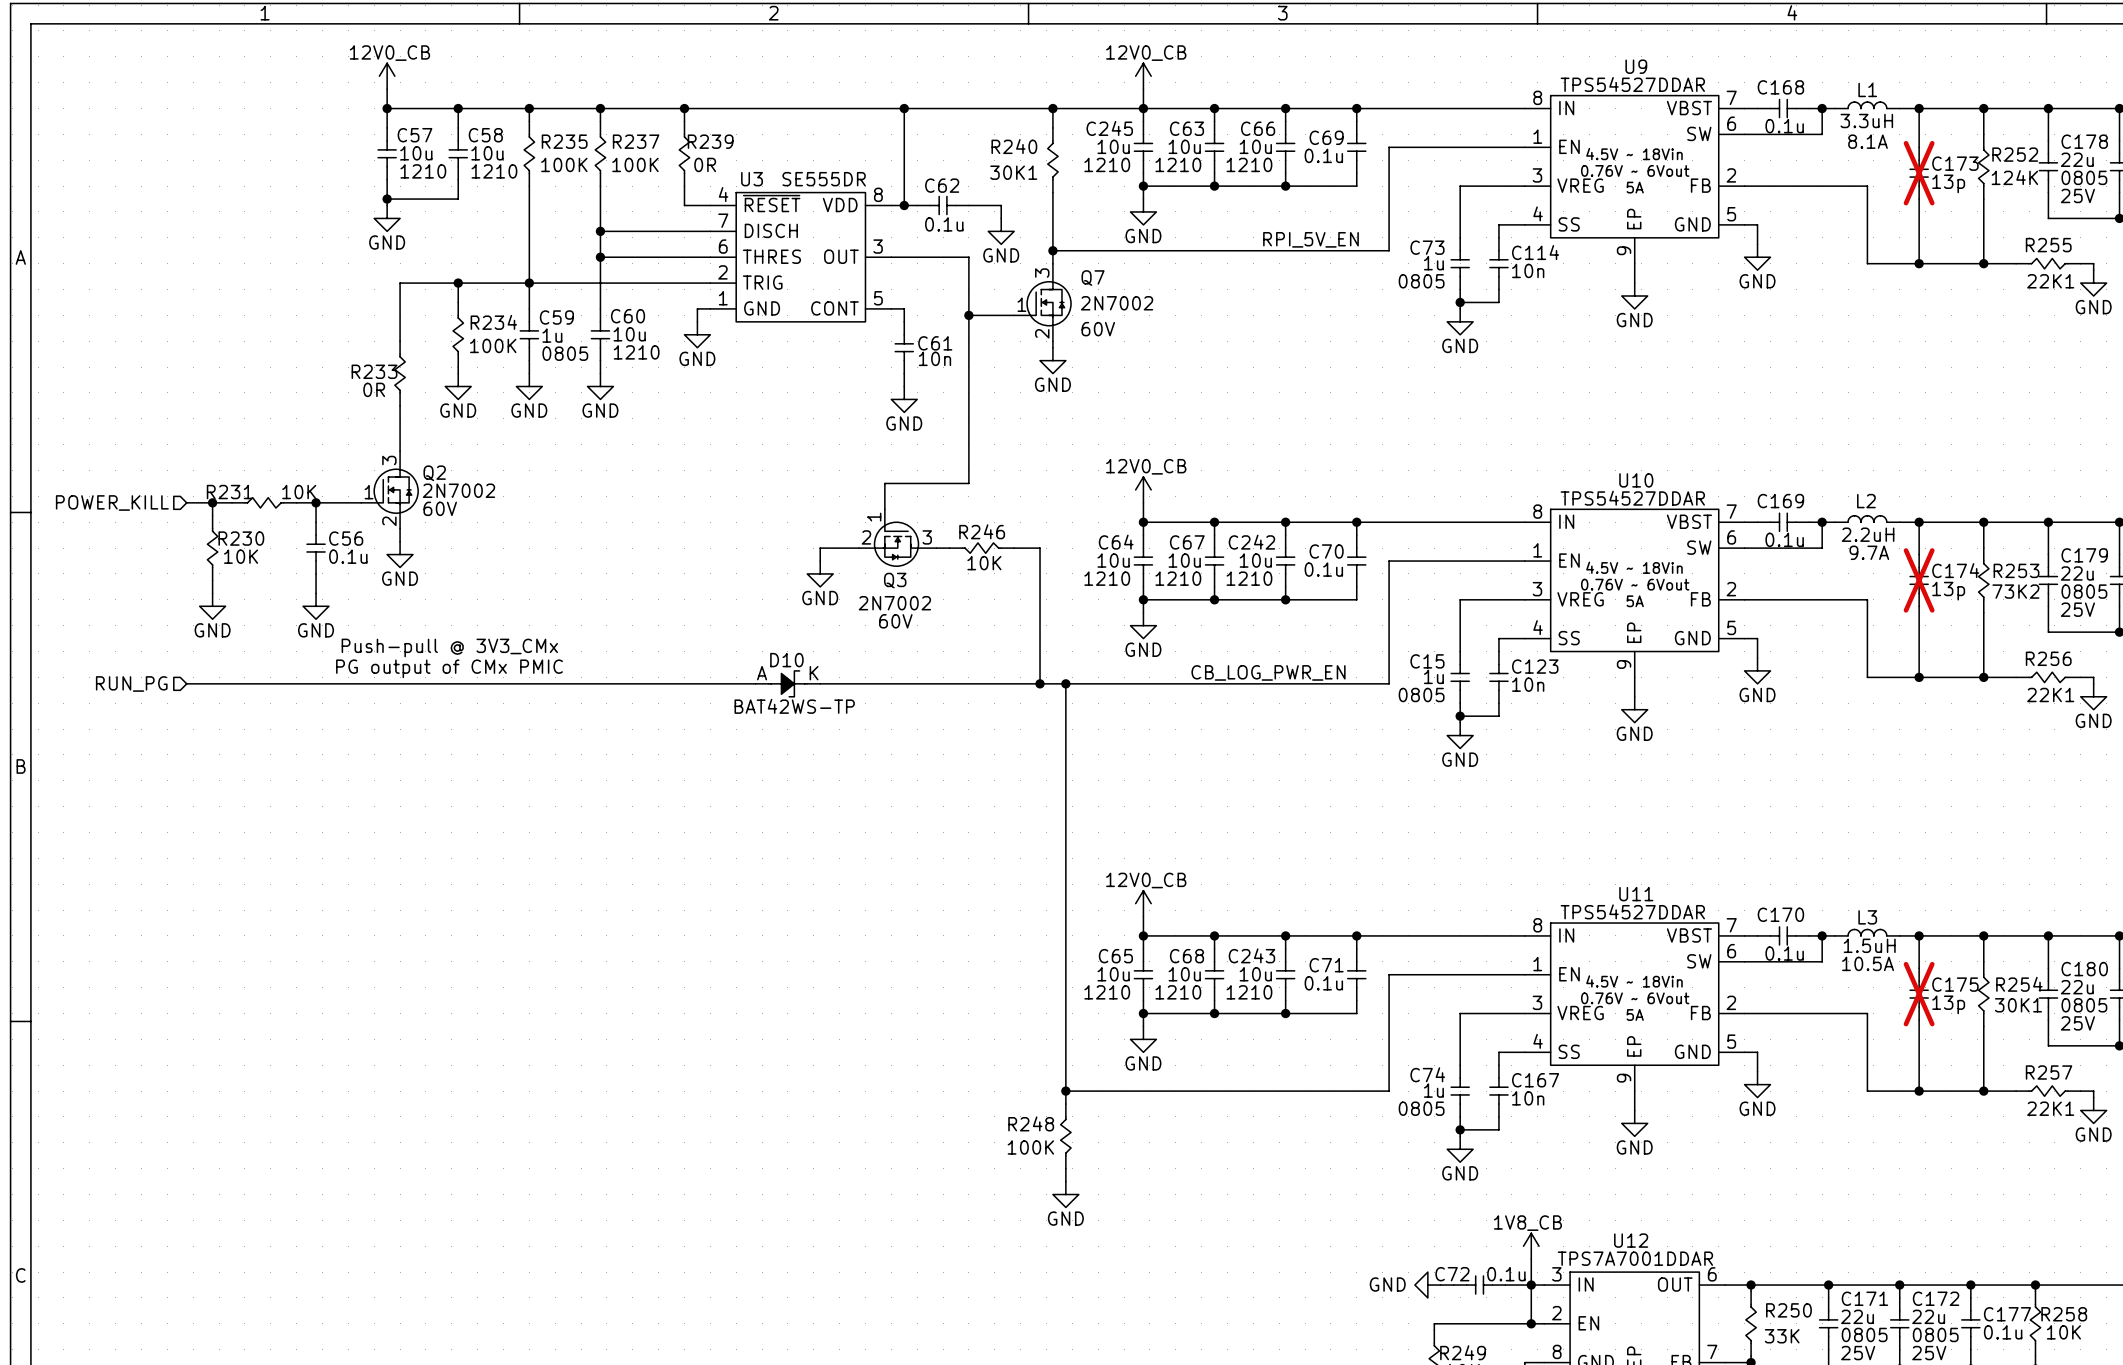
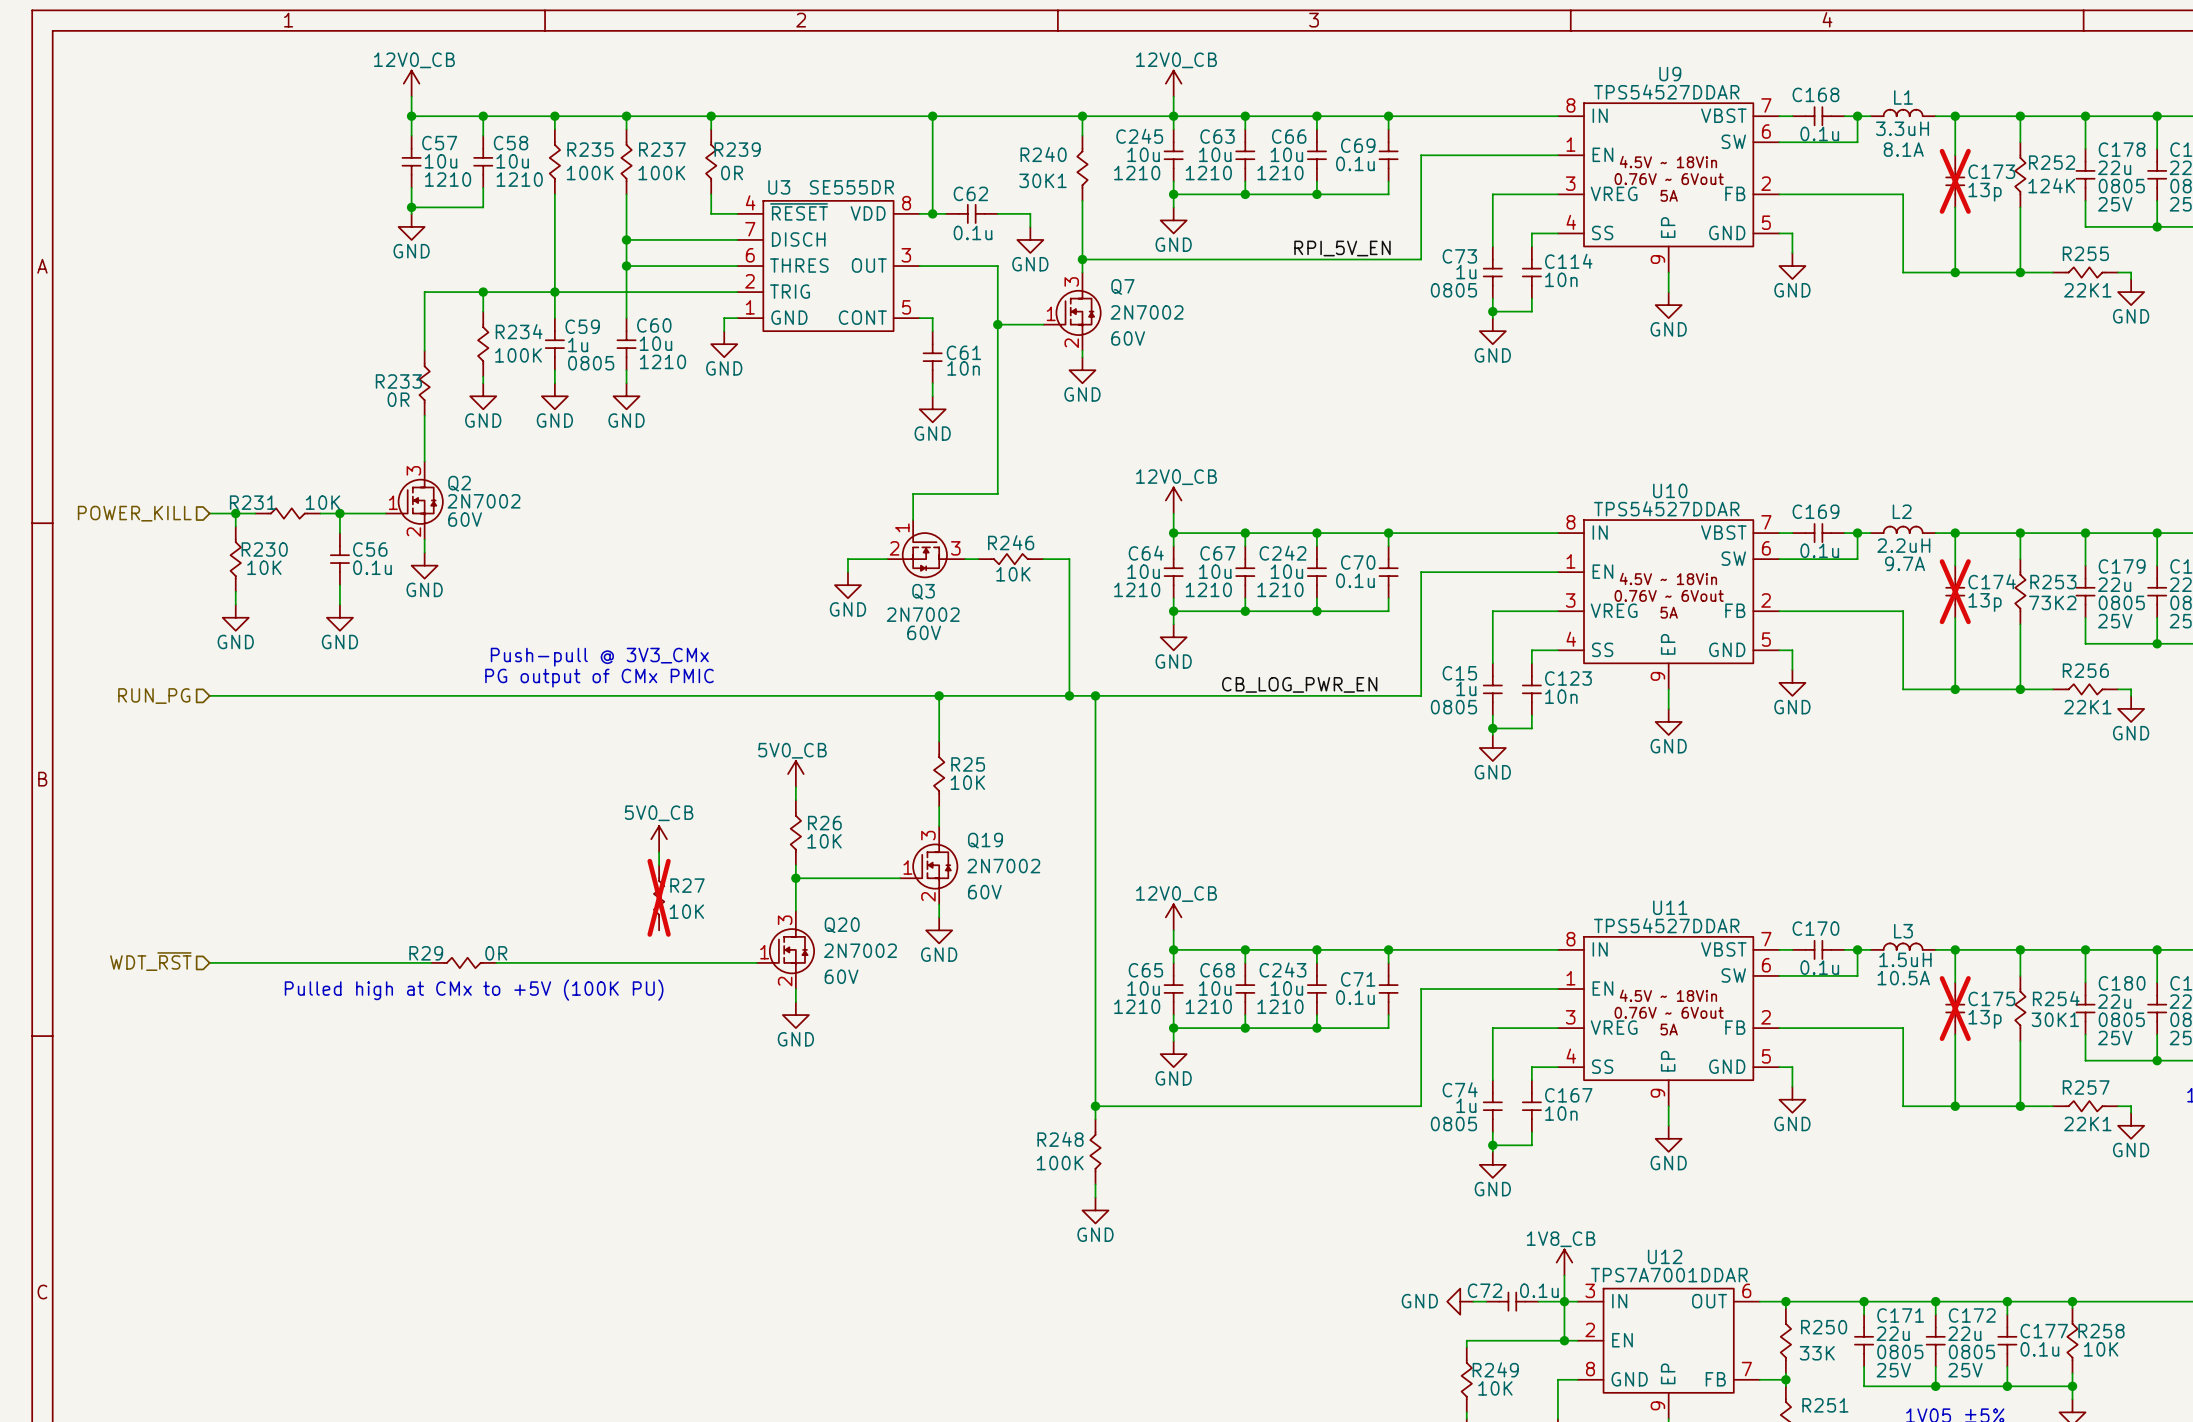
text position: Push-pull @ 3V3_CMx (449, 648) -> Push-pull @ 3V3_CMx (599, 657)
text position: PG output of CMx PMIC (449, 668) -> PG output of CMx PMIC (599, 678)
D10: BAT42WS-TP (787, 683) -> none
wire: none -> (939, 695) (939, 741)
junction: none -> (939, 695)
power symbol: none -> 5V0_CB (795, 774)
R25: none -> 10K (939, 774)
wire: none -> (795, 787) (795, 800)
wire: none -> (939, 806) (939, 826)
R26: none -> 10K (795, 832)
power symbol: none -> 5V0_CB (659, 839)
wire: none -> (659, 852) (659, 865)
wire: none -> (795, 865) (795, 910)
Q19: none -> 2N7002 (928, 865)
wire: none -> (795, 878) (900, 878)
junction: none -> (795, 878)
R27: none -> 10K (659, 897)
wire: none -> (939, 904) (939, 917)
power symbol: none -> GND (939, 930)
Q20: none -> 2N7002 (785, 949)
hierarchical label: none -> WDT_~{RST} (150, 961)
wire: none -> (209, 962) (431, 962)
R29: none -> 0R (463, 962)
wire: none -> (496, 962) (756, 962)
wire: none -> (795, 989) (795, 1002)
text: none -> Pulled high at CMx to +5V (100K PU) (474, 990)
power symbol: none -> GND (795, 1015)

